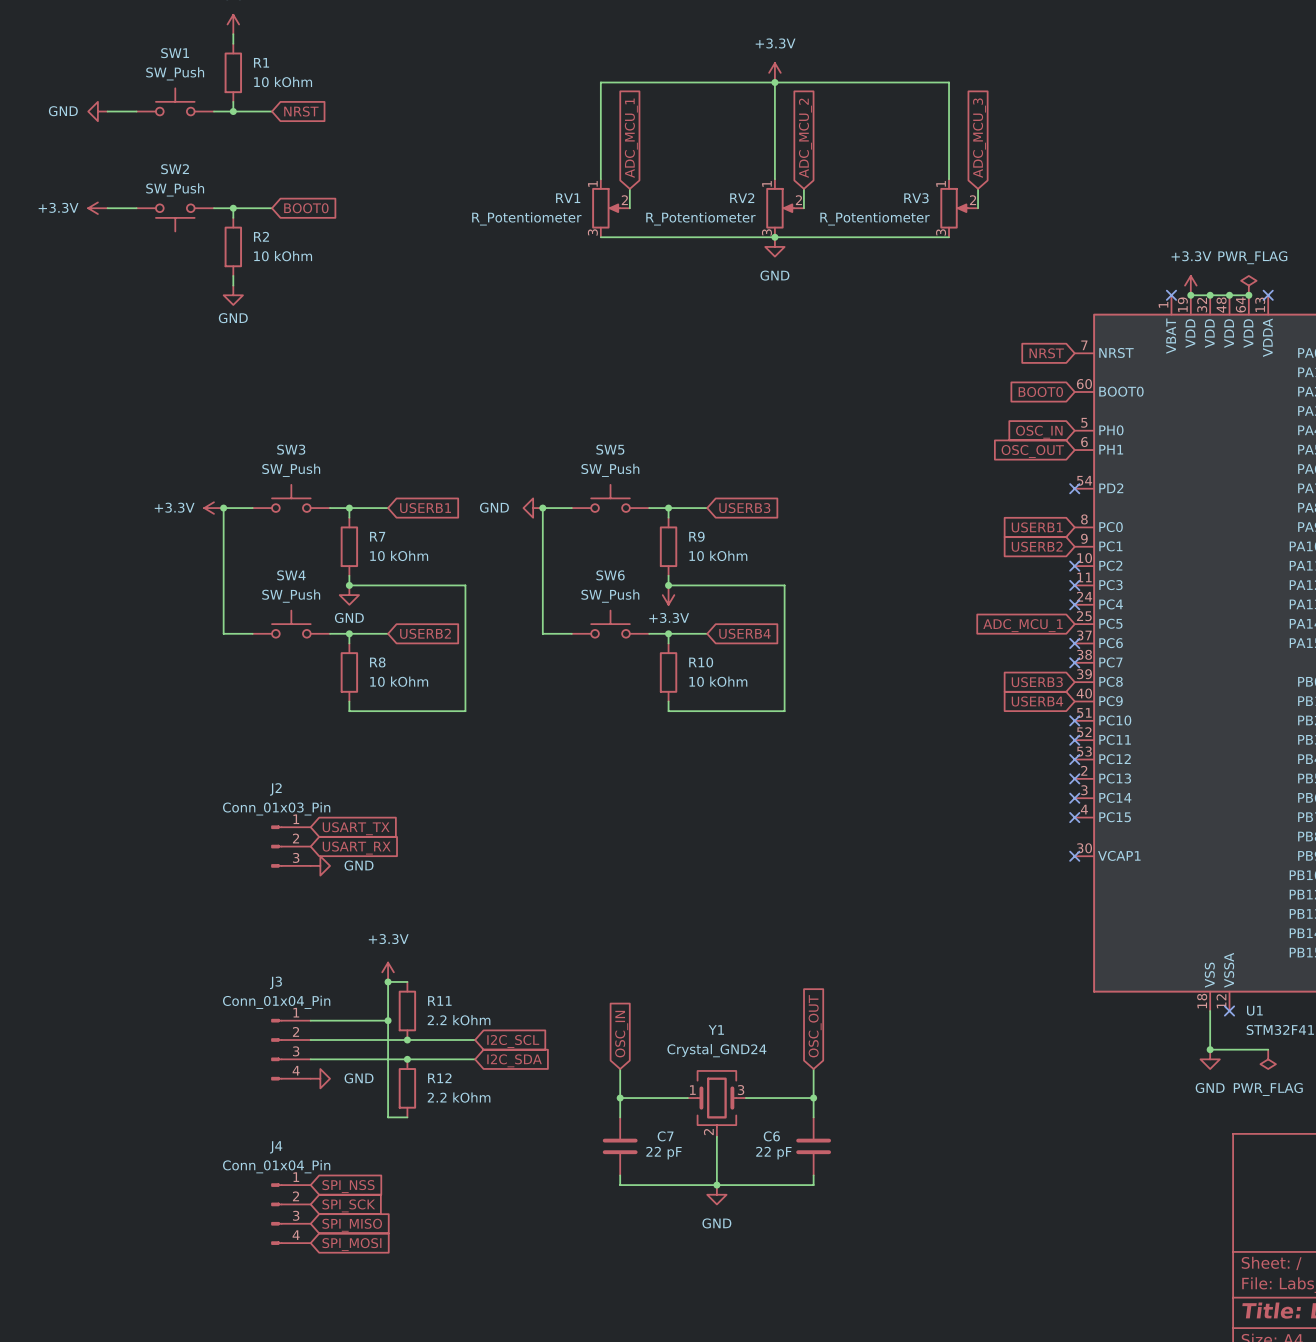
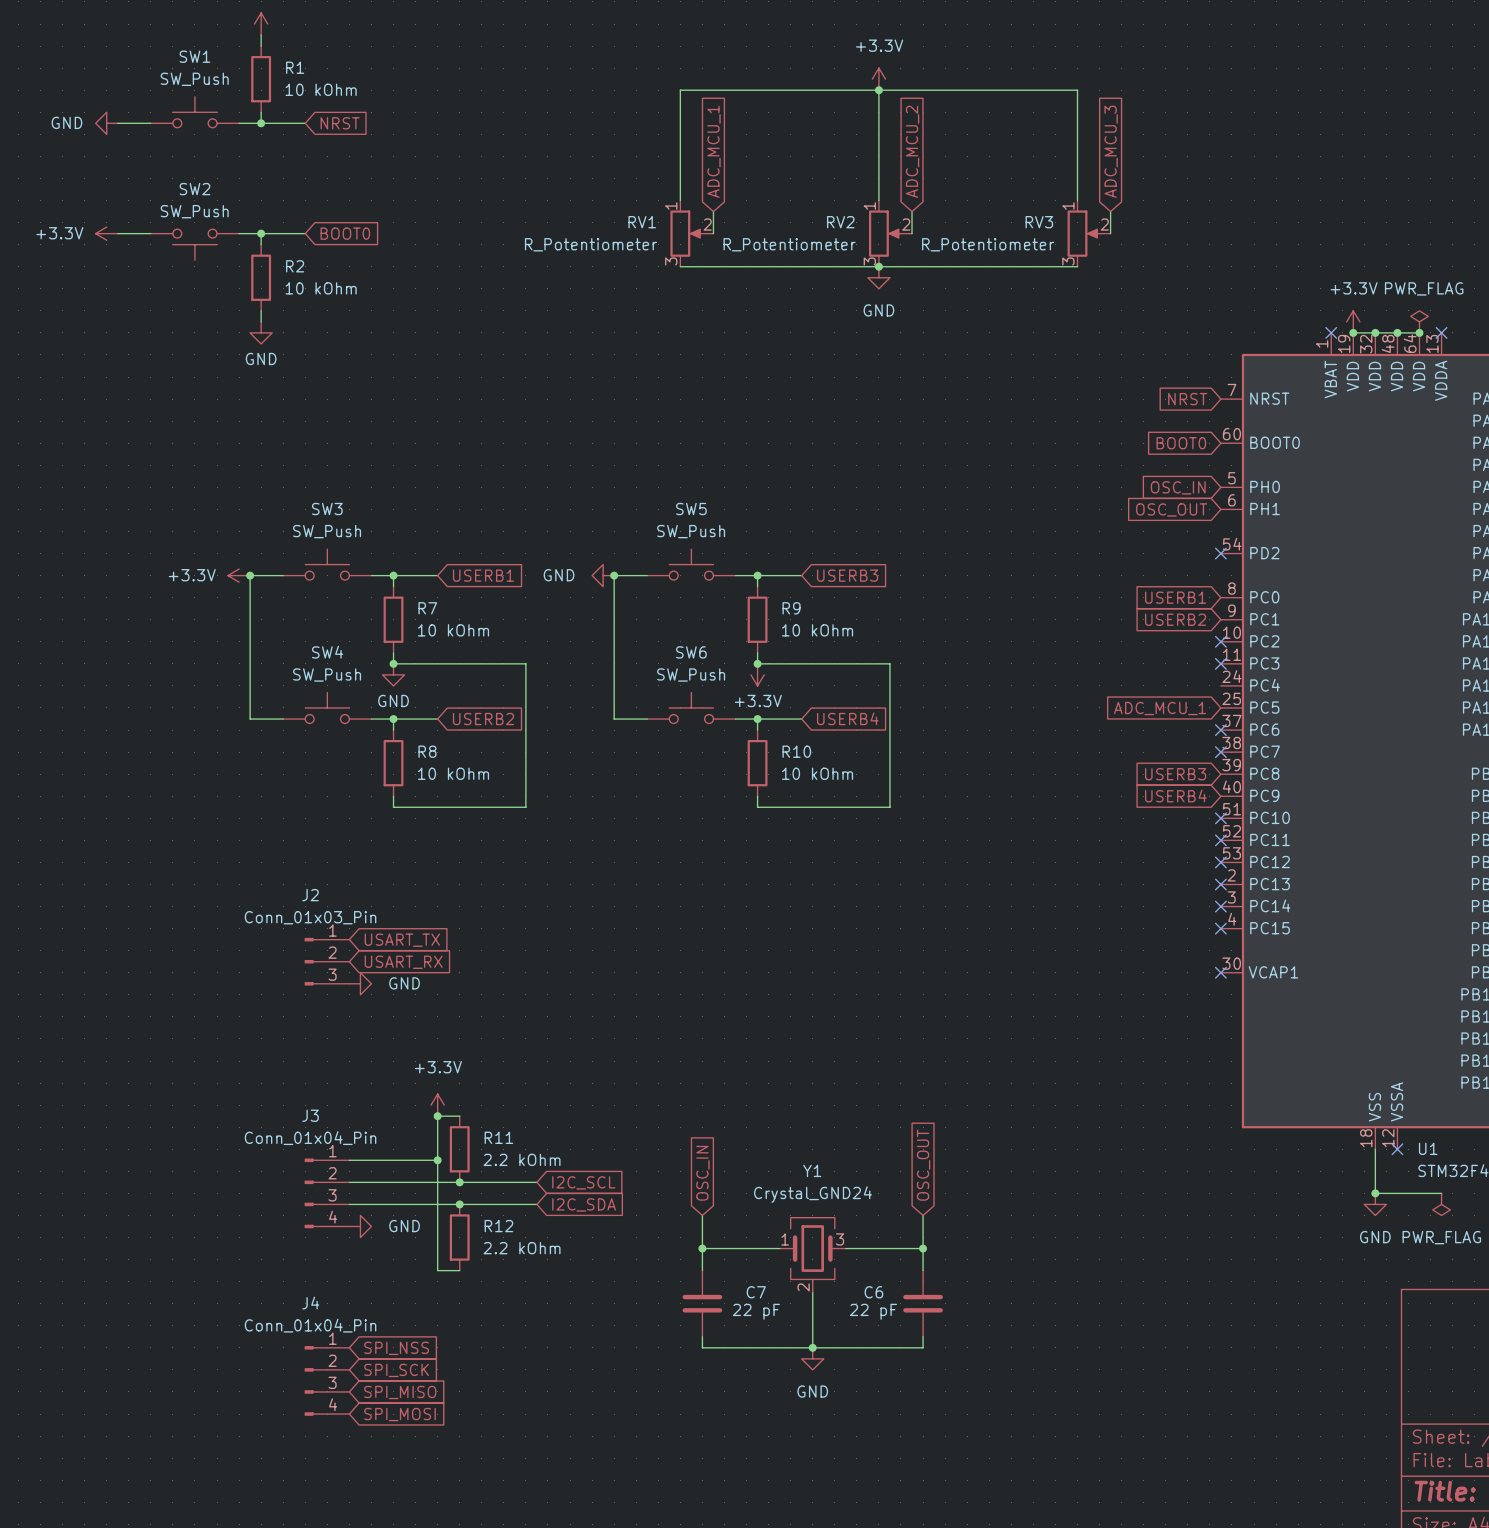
no-connect mark: (1074, 604) -> none

